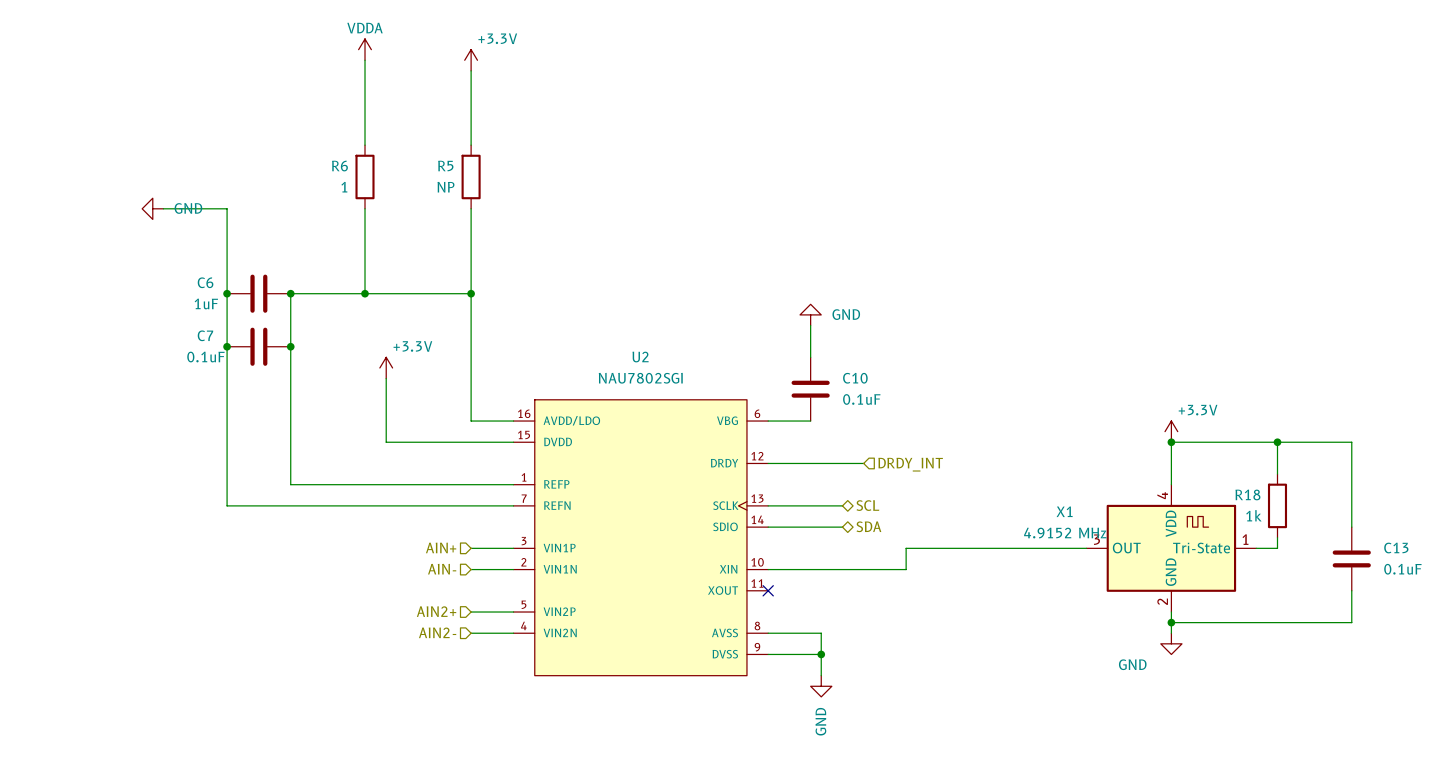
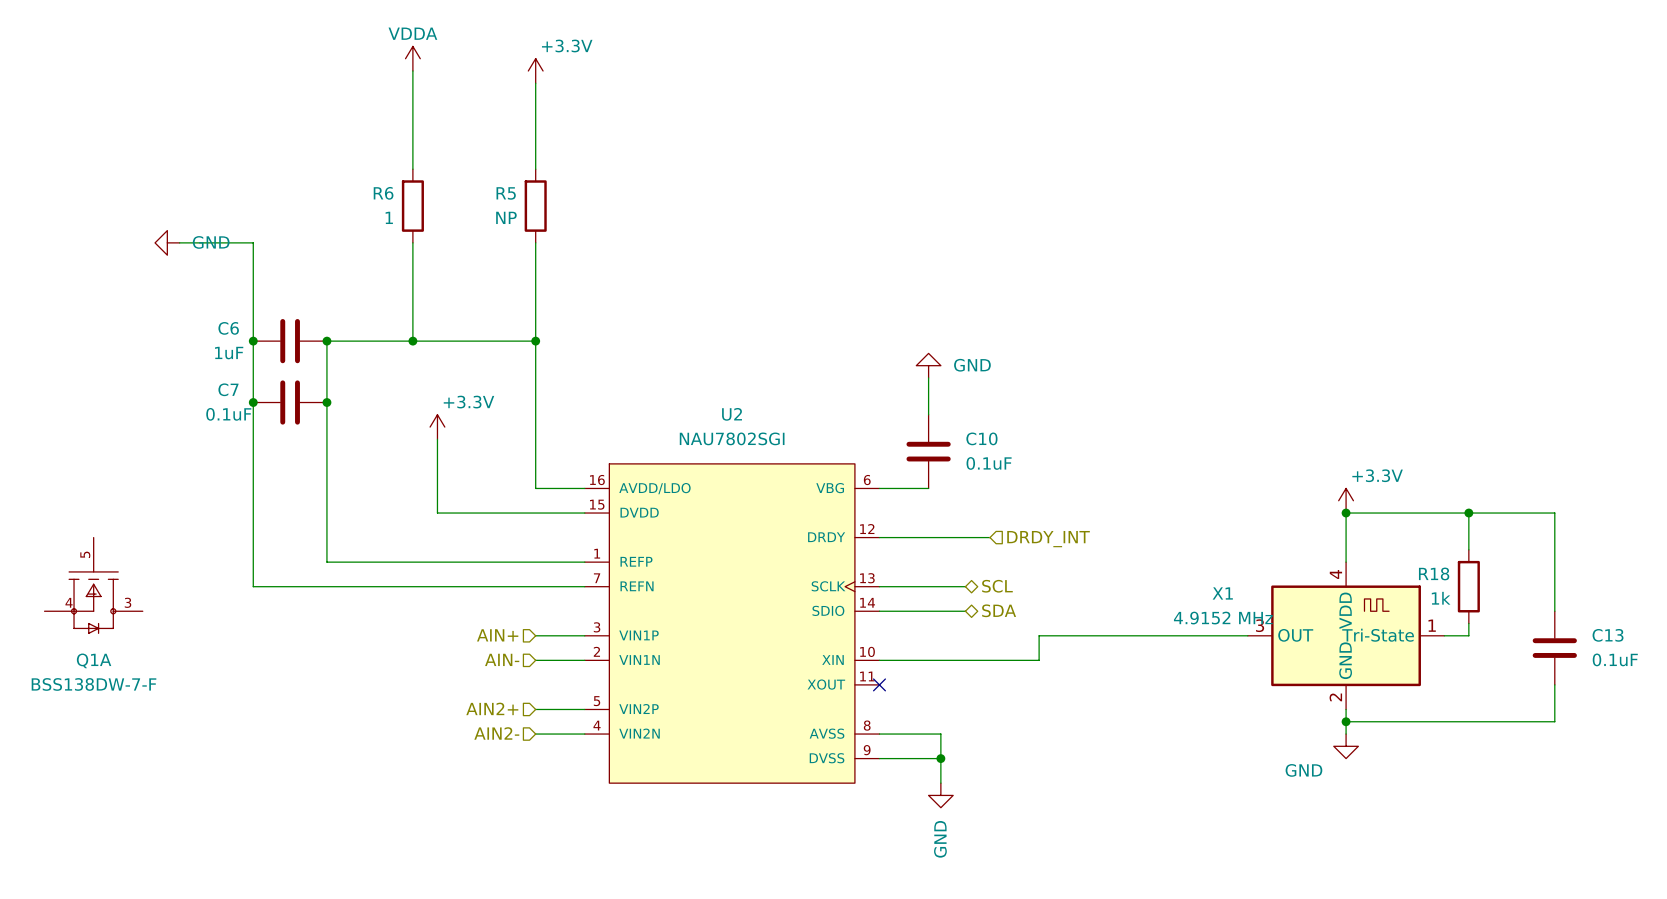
Q1A: none -> BSS138DW-7-F (93, 585)

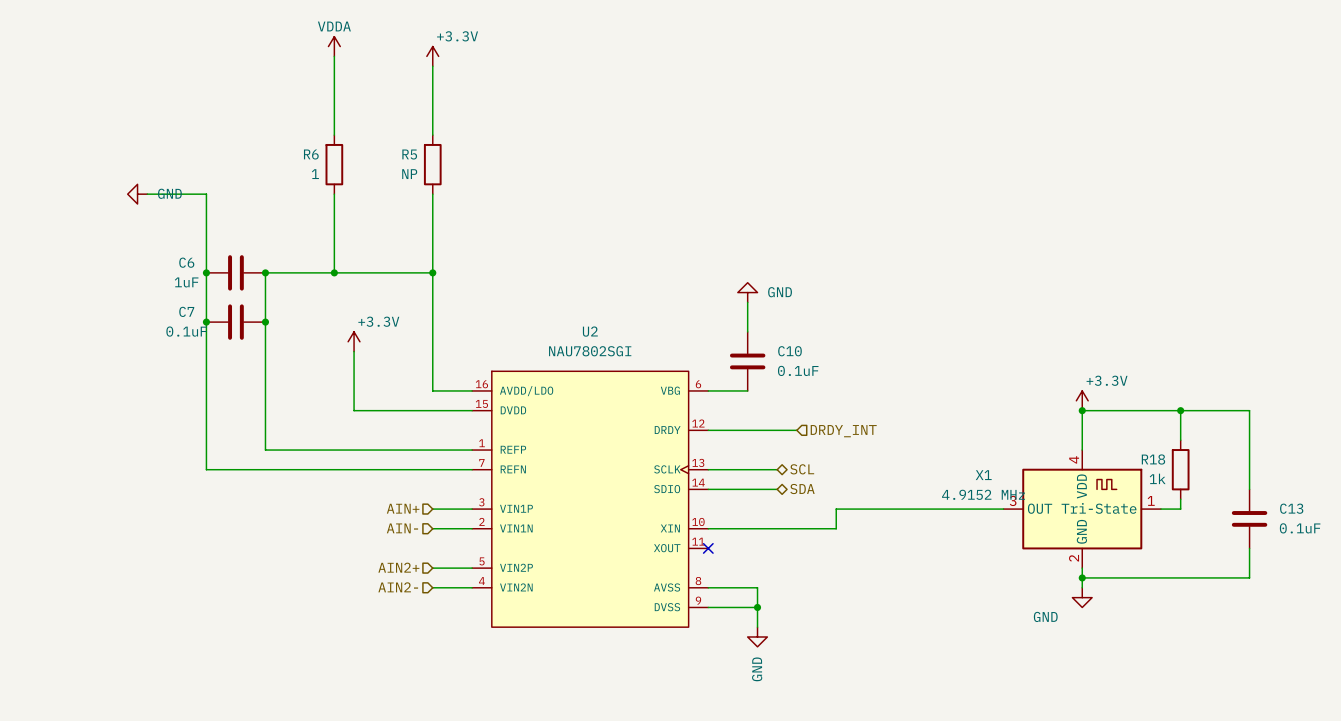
Q1A: BSS138DW-7-F (93, 585) -> none

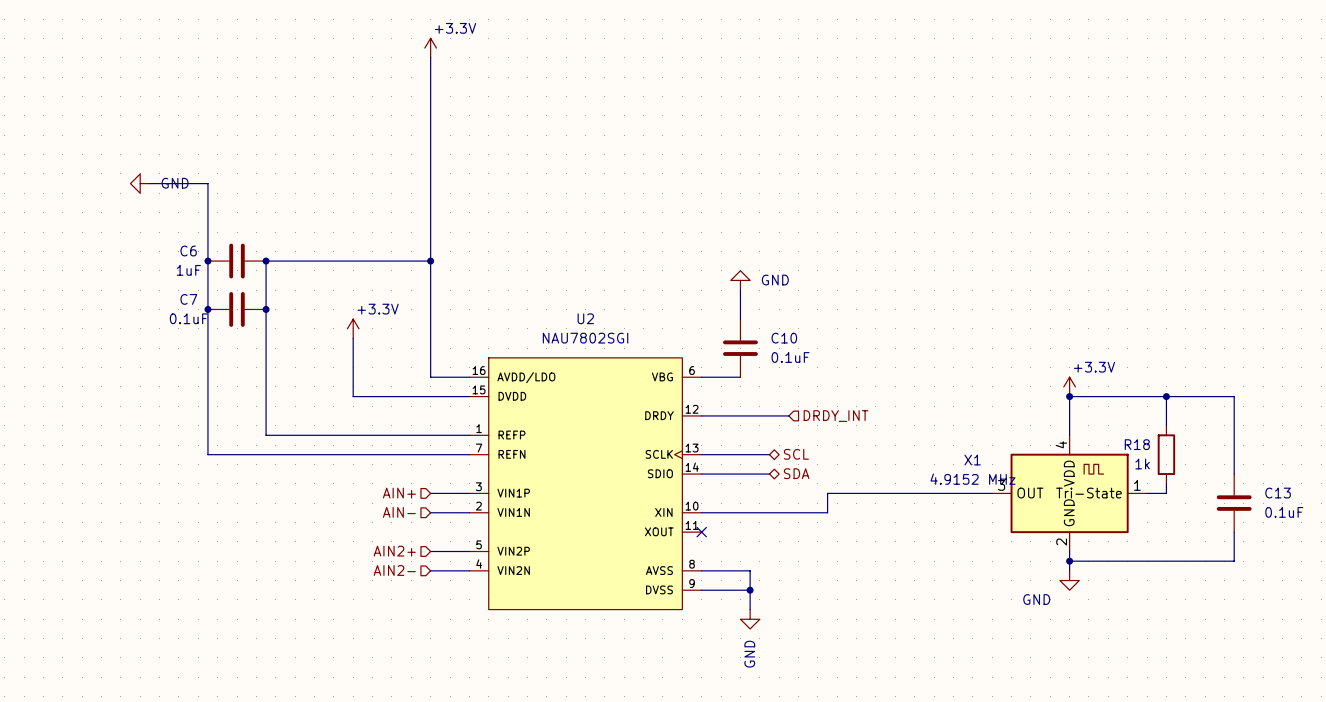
power symbol: VDDA (334, 46) -> none
wire: (334, 56) (334, 135) -> none
wire: none -> (430, 125) (430, 183)
R6: 1 (334, 164) -> none
R5: NP (432, 164) -> none
wire: (334, 194) (334, 272) -> none
junction: (334, 272) -> none

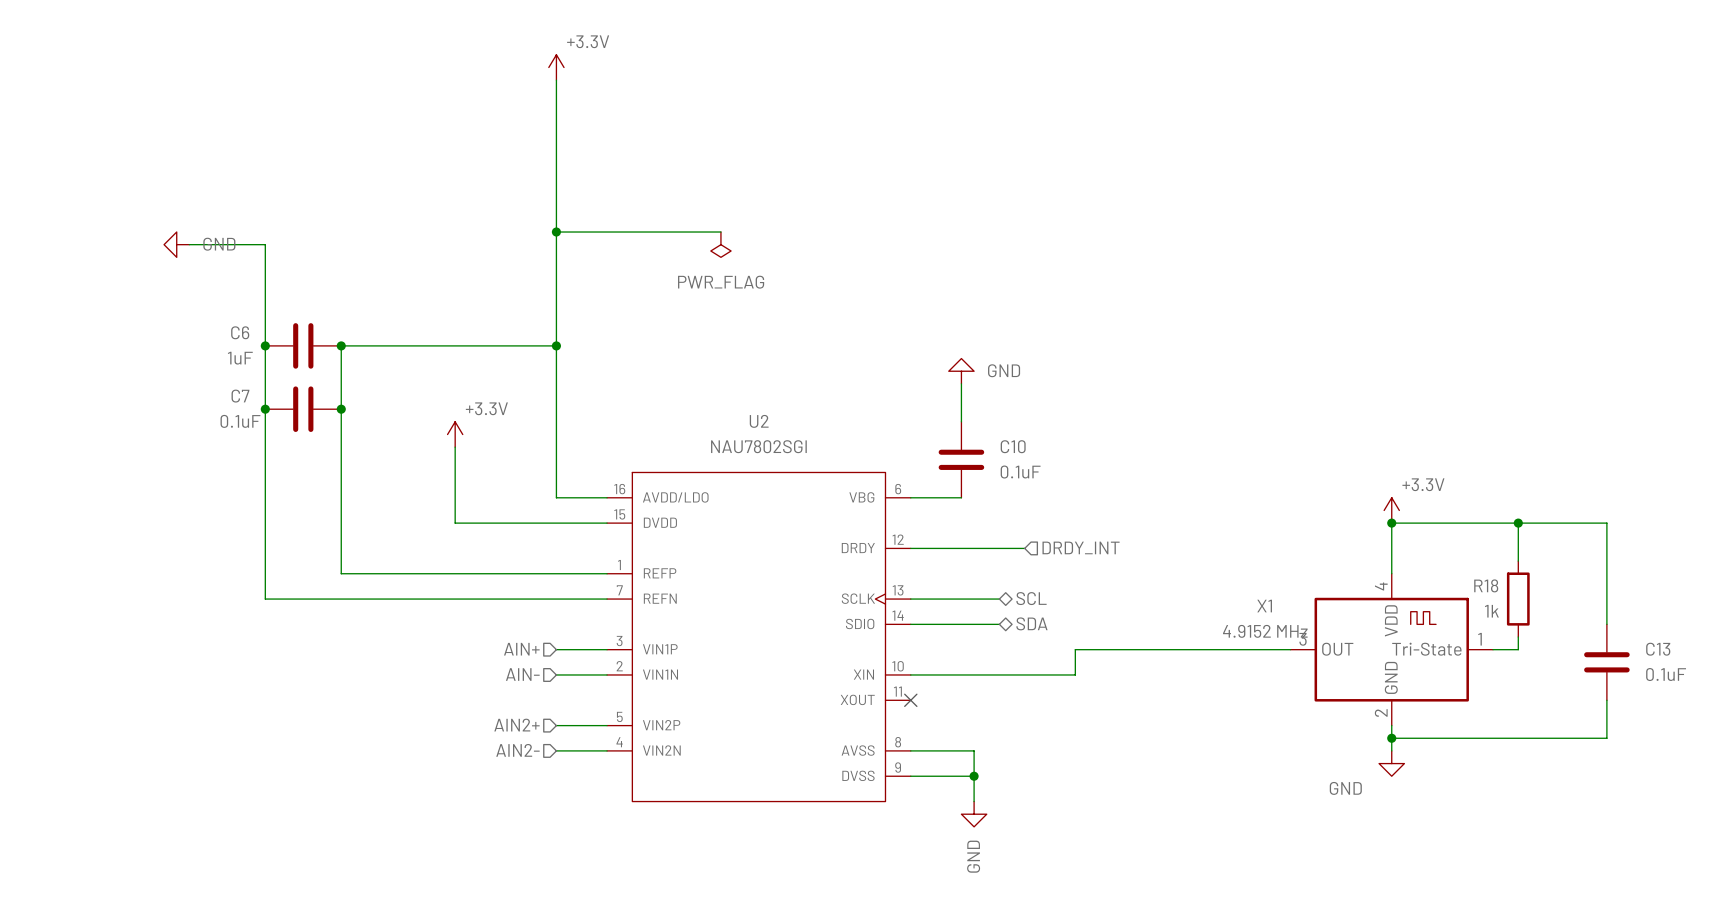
wire: none -> (556, 232) (720, 232)
junction: none -> (556, 232)
power symbol: none -> PWR_FLAG (720, 244)

